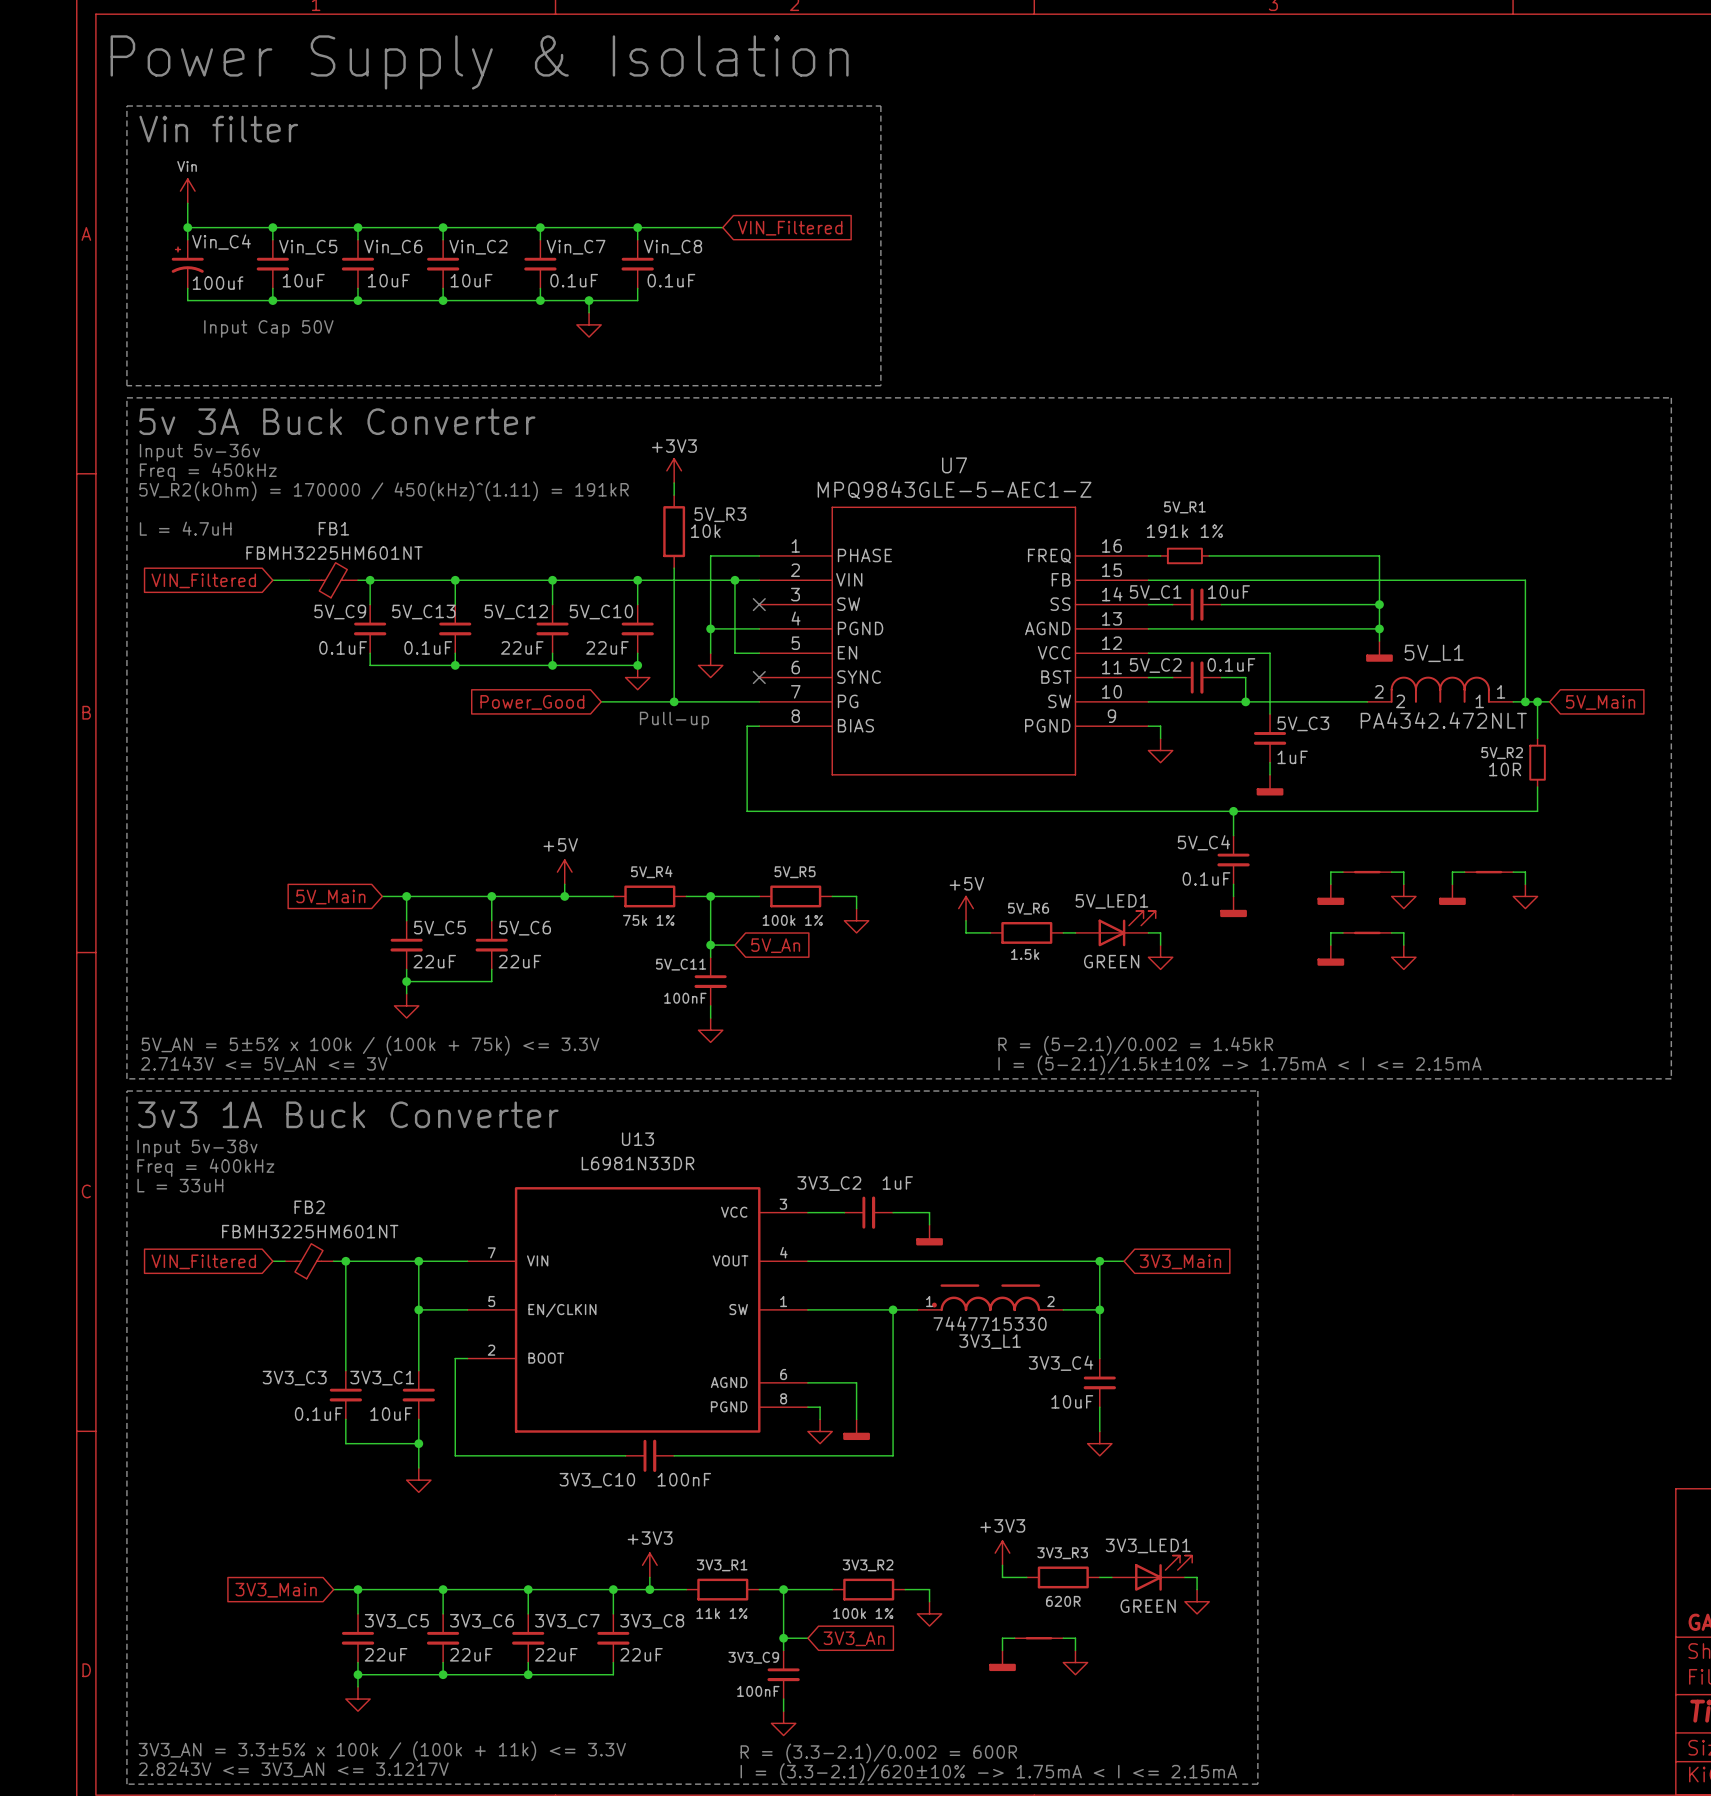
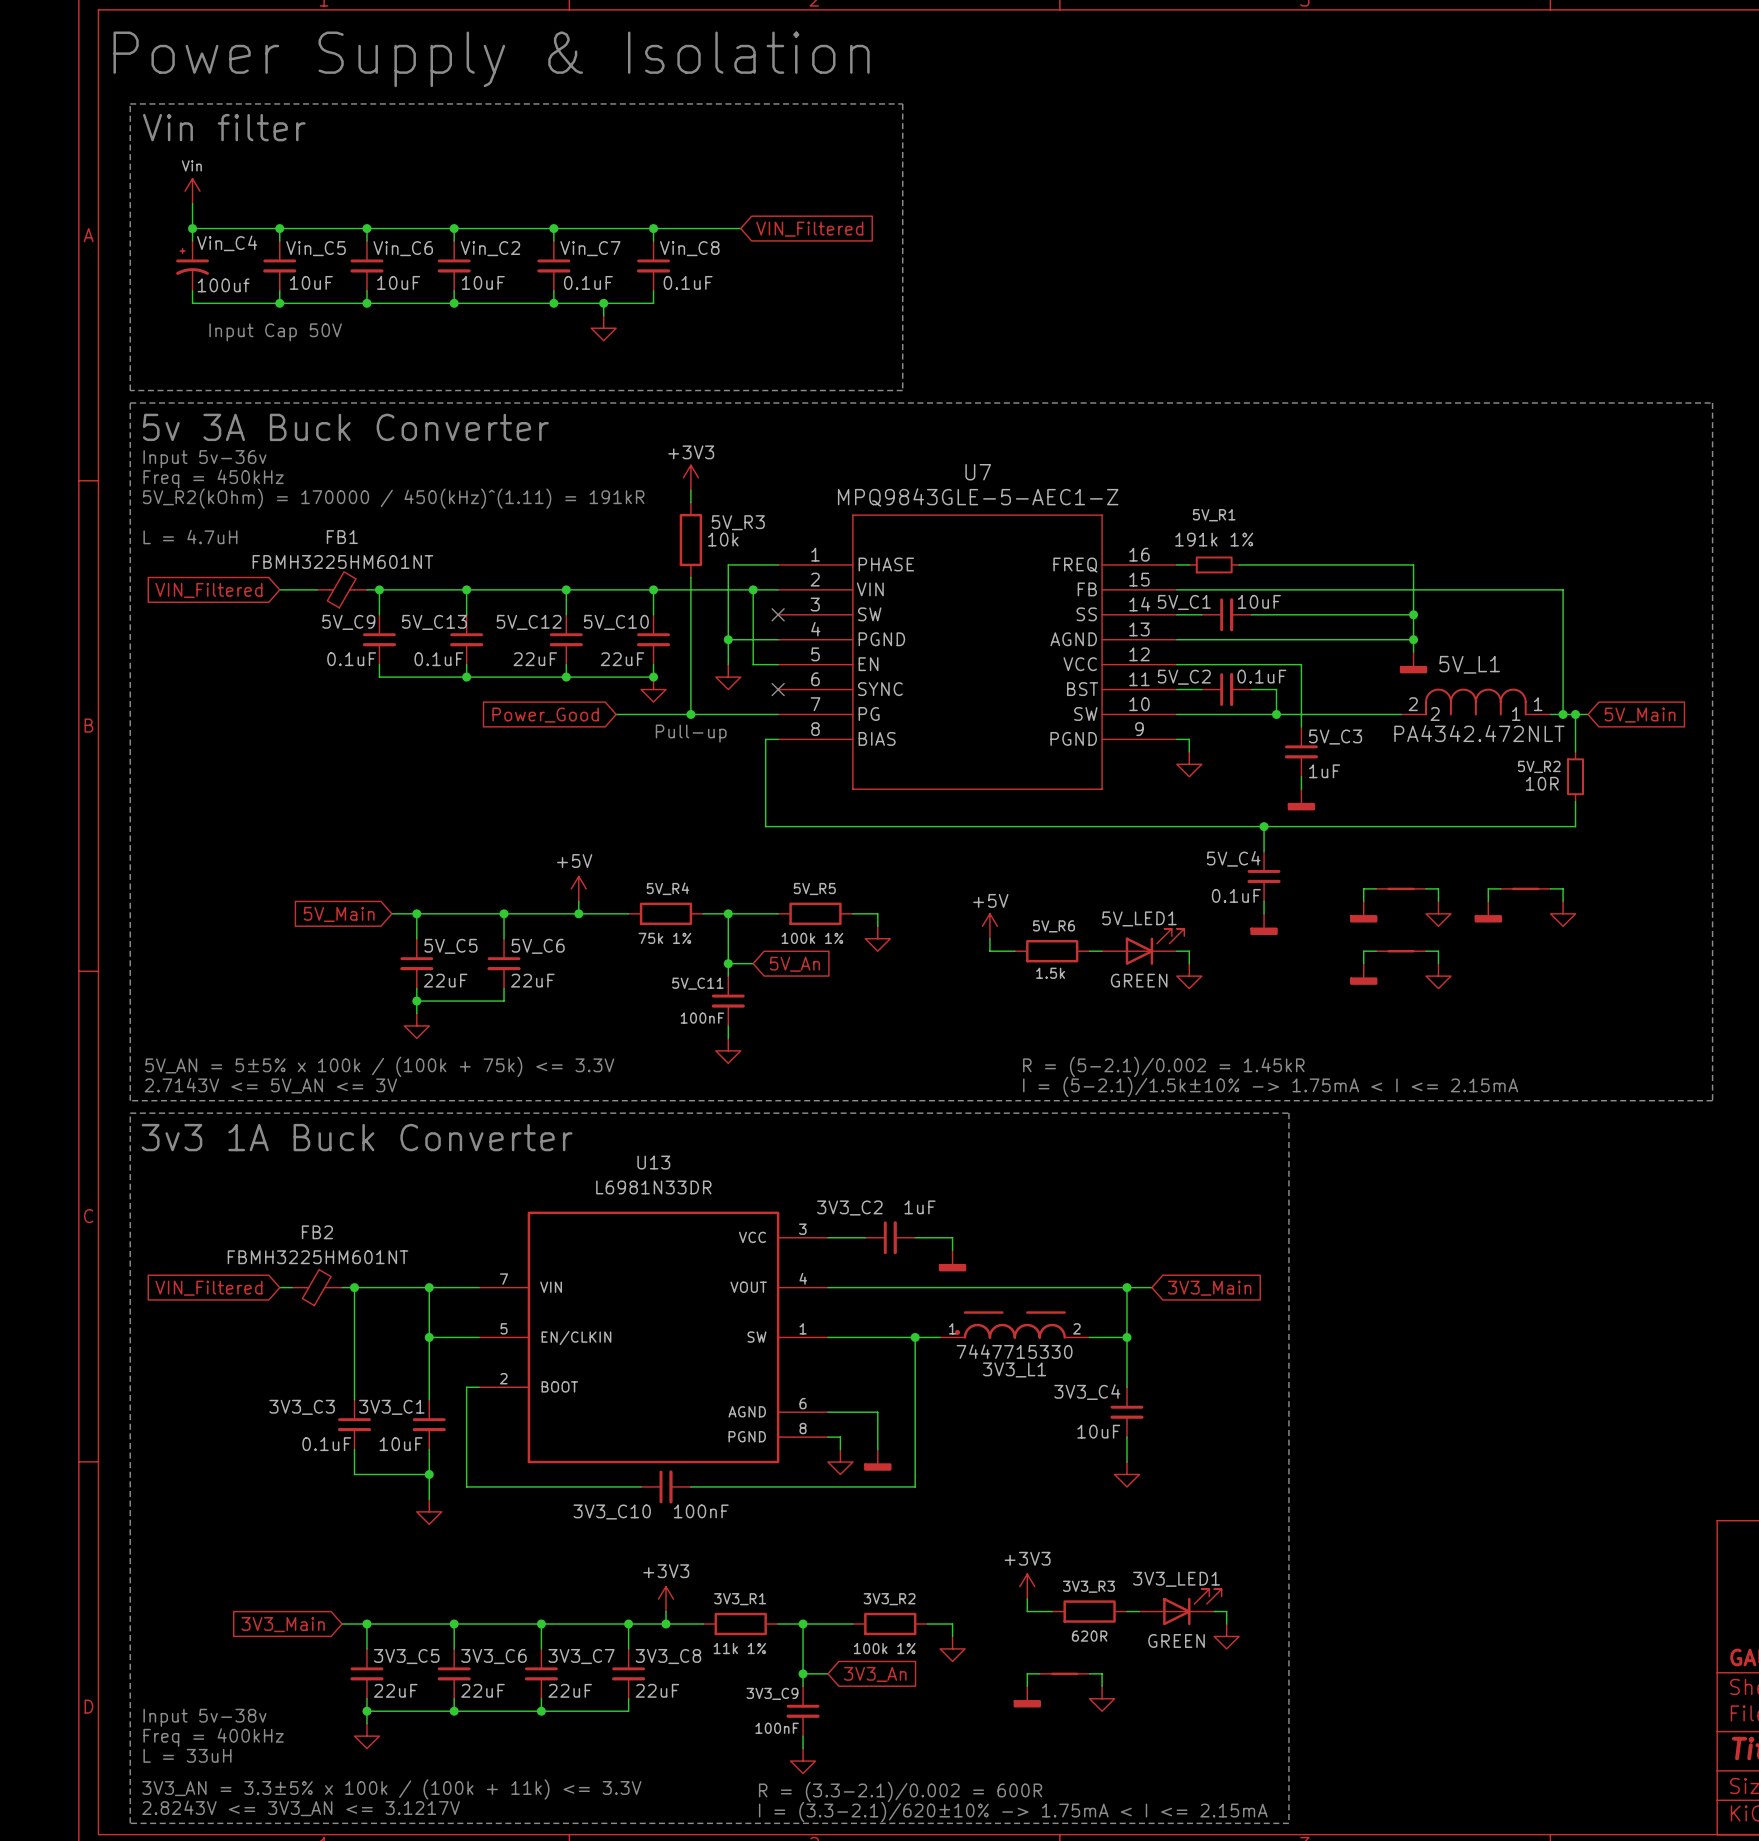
text: Input 5v-38v (197, 1148) -> none
text: Freq = 400kHz (205, 1167) -> none
text: L = 33uH (180, 1185) -> none
text: none -> Input 5v-38v (204, 1717)
text: none -> Freq = 400kHz (213, 1737)
text: none -> L = 33uH (187, 1755)

